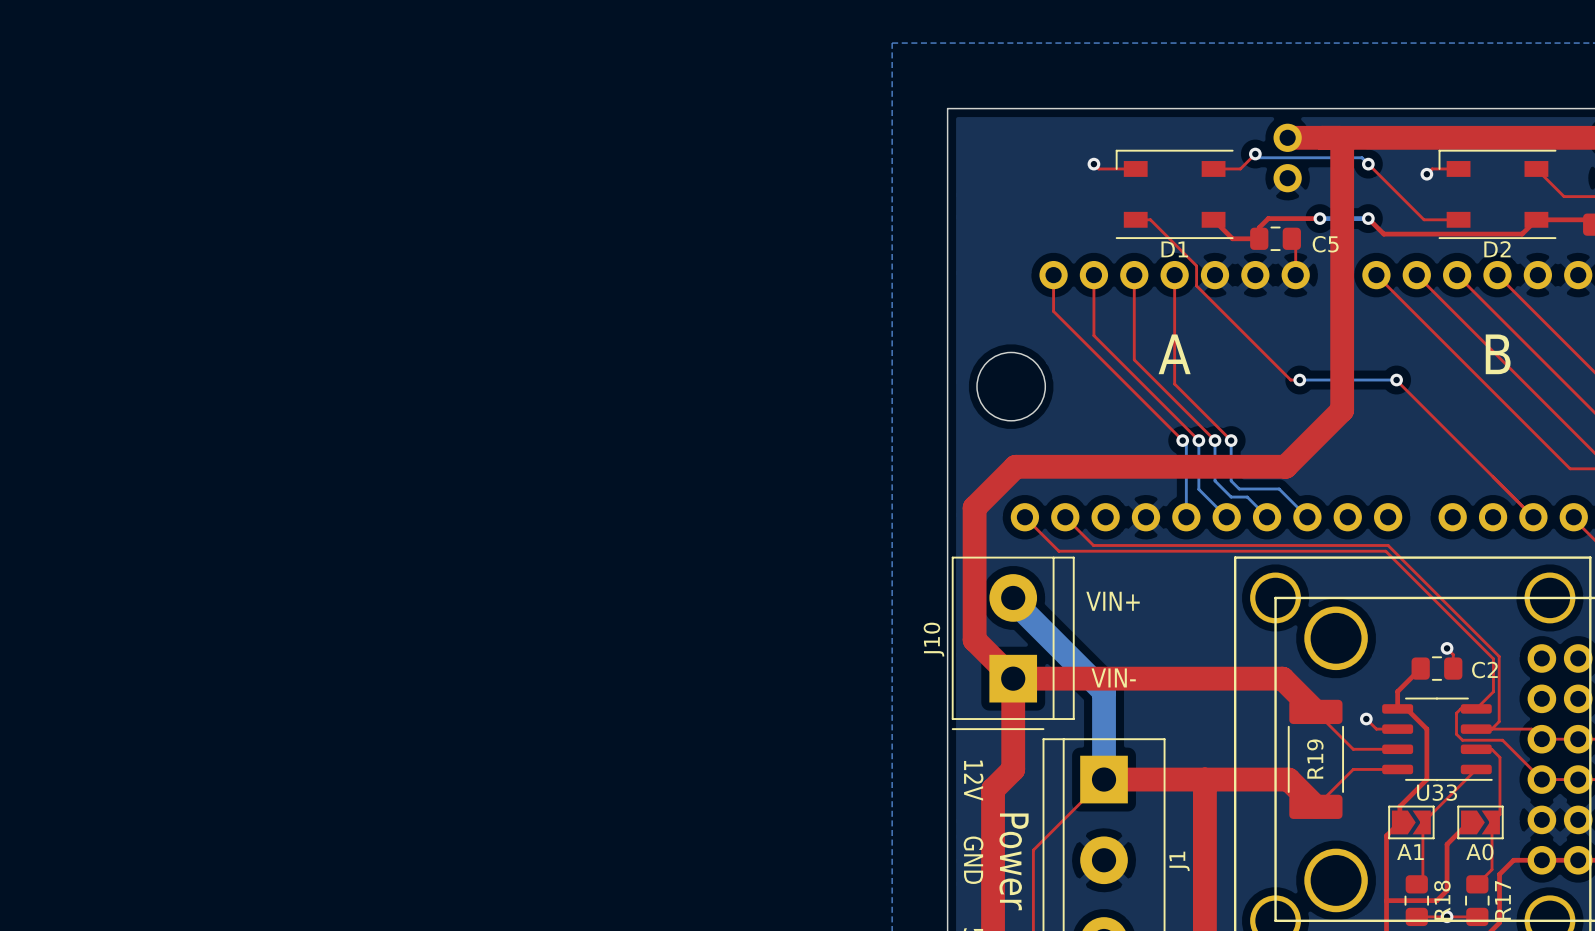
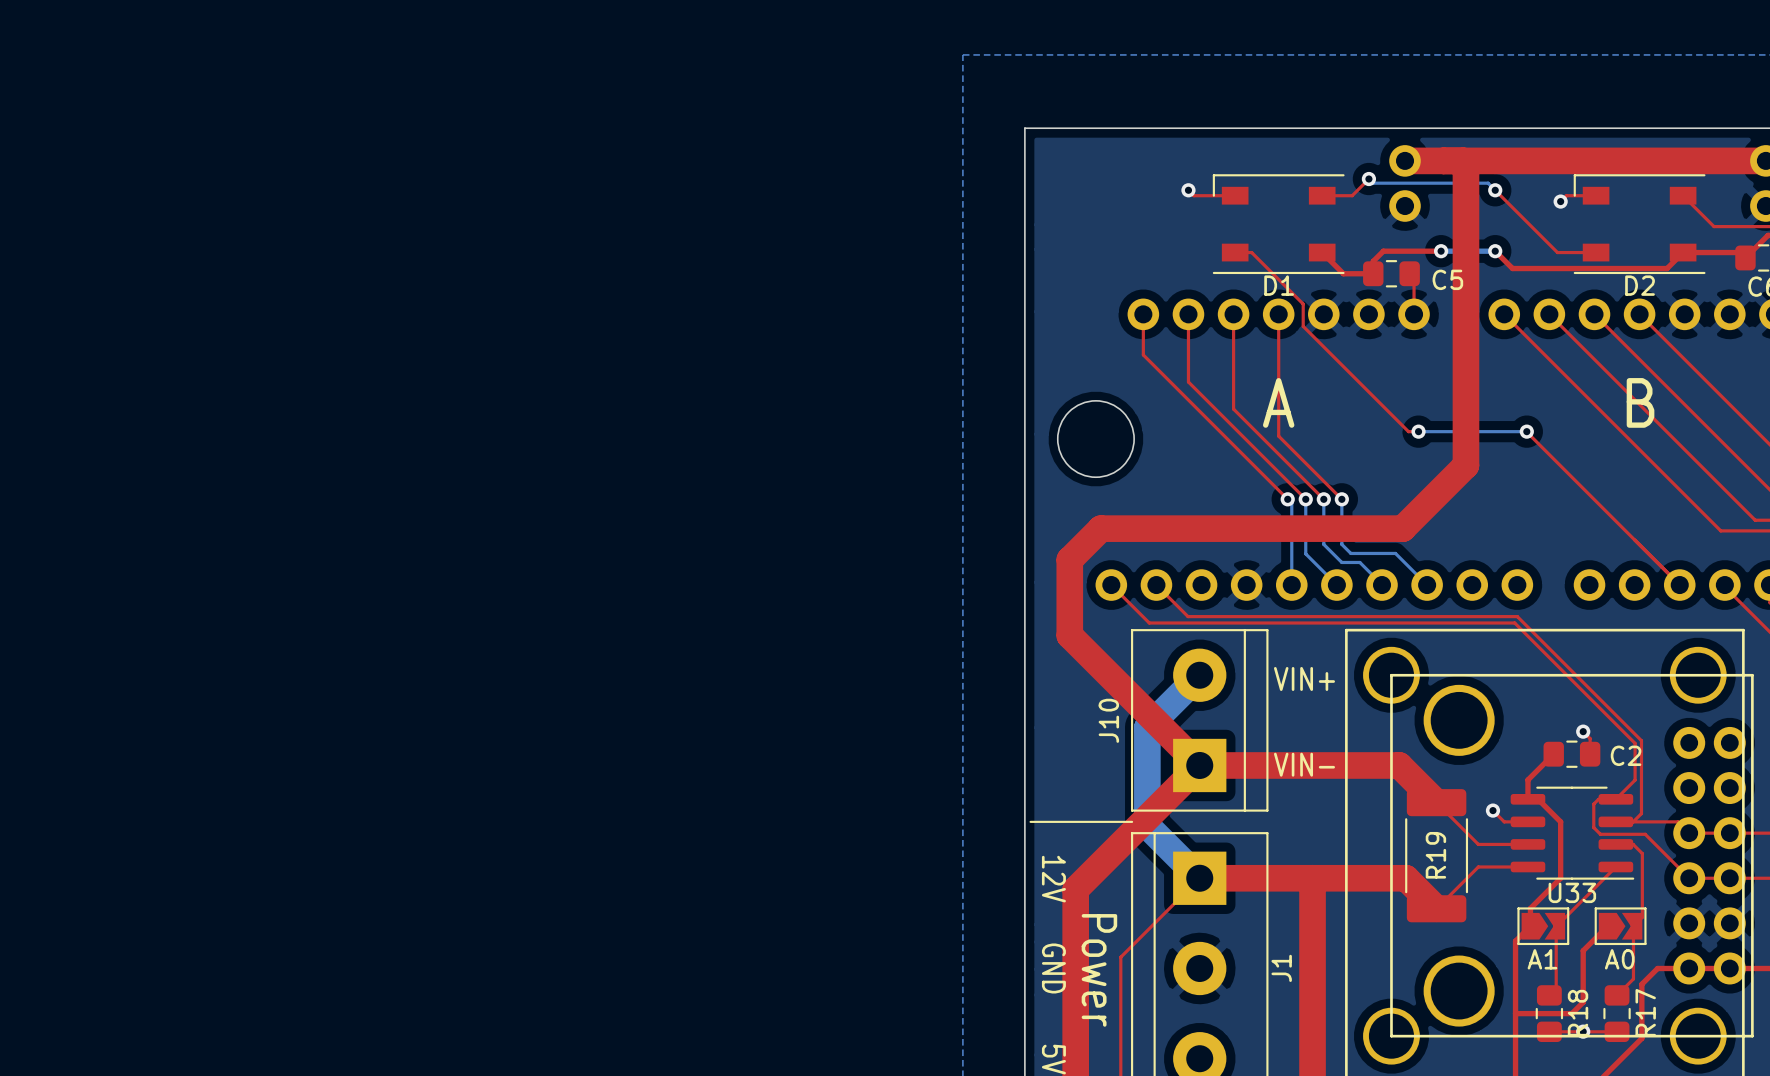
top track: (987, 494) (974, 507) (974, 640) (1013, 678) -> (1069, 559) (1069, 635) (1199, 765) (1098, 866)
bottom track: (1013, 597) (1013, 600) (1104, 691) (1104, 779) -> (1199, 675) (1147, 727) (1147, 825) (1199, 878)
text position: VIN+ (1113, 601) -> VIN+ (1304, 678)
J10 position: (1013, 638) -> (1199, 720)
text position: VIN- (1113, 677) -> VIN- (1304, 764)
top track: (1013, 678) (1104, 678) -> none
top track: (1013, 678) (1013, 769) -> none

